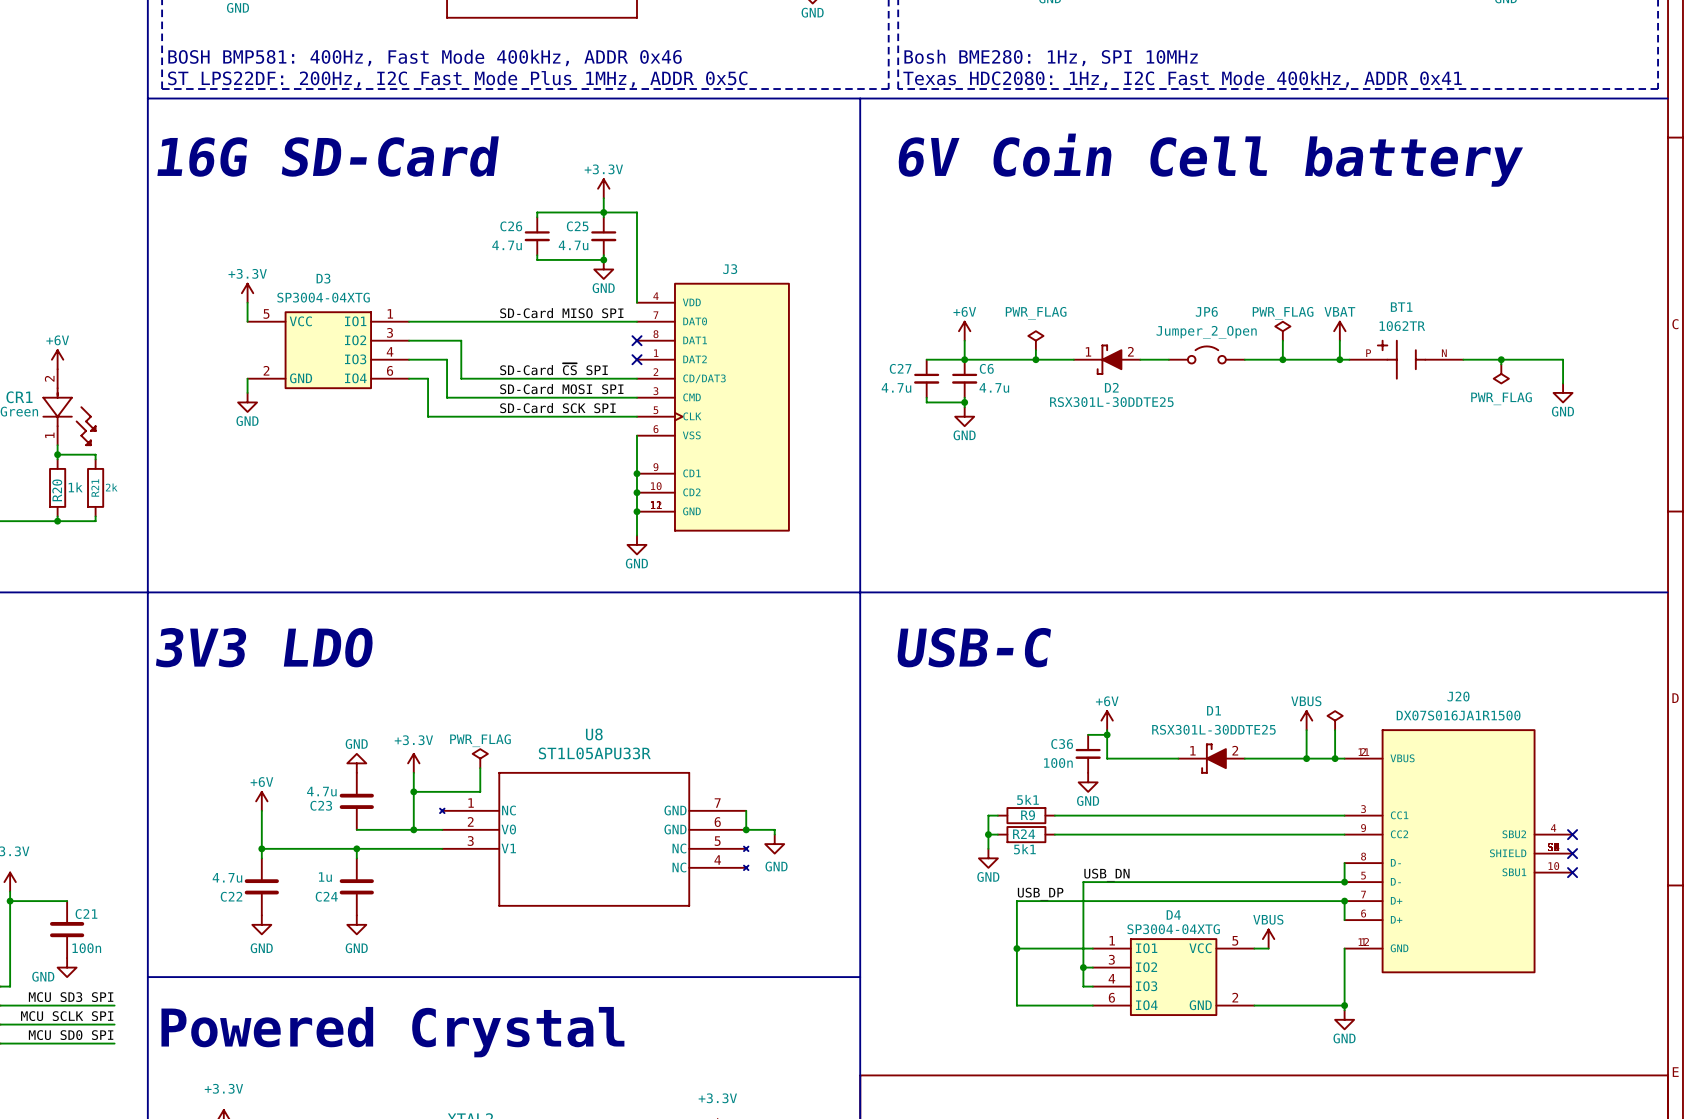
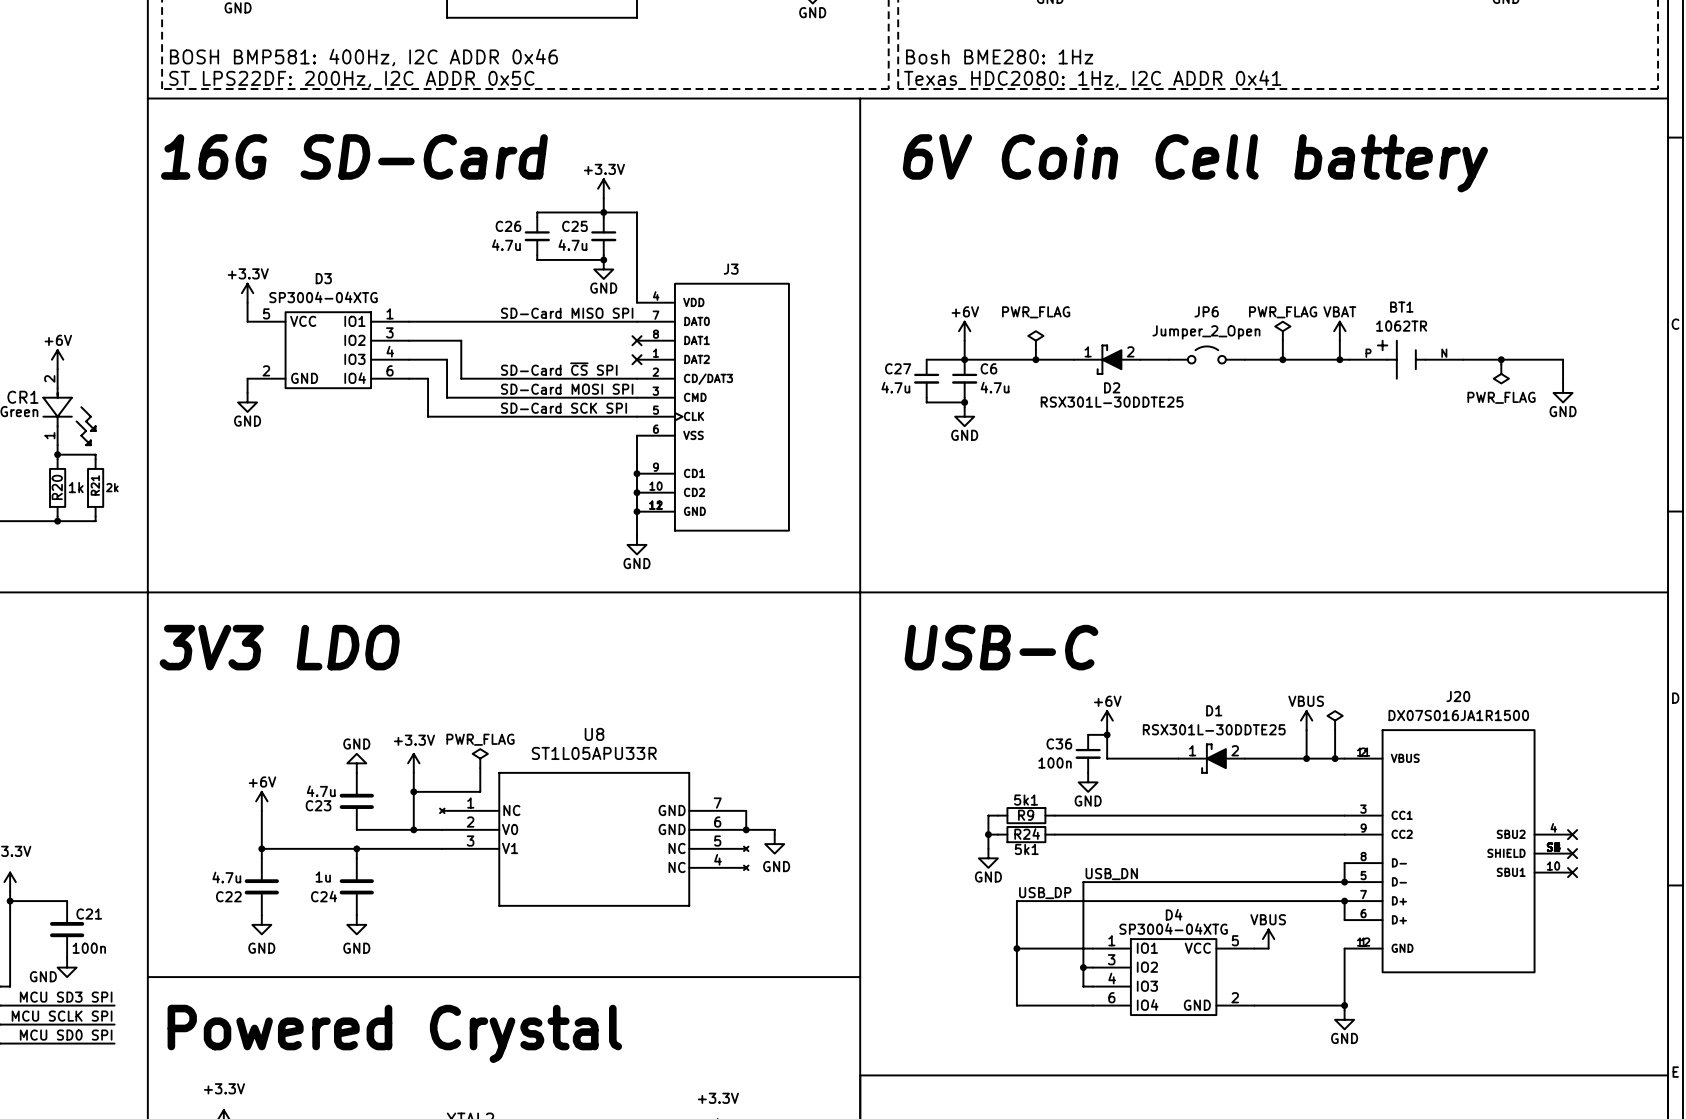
text: BOSH BMP581: 400Hz, Fast Mode 400kHz, ADDR 0x46 (425, 57) -> BOSH BMP581: 400Hz, I2C ADDR 0x46 (363, 57)
text: Bosh BME280: 1Hz, SPI 10MHz (1051, 57) -> Bosh BME280: 1Hz (999, 56)
text: ST LPS22DF: 200Hz, I2C Fast Mode Plus 1MHz, ADDR 0x5C (457, 79) -> ST LPS22DF: 200Hz, I2C ADDR 0x5C (351, 79)
text: Texas HDC2080: 1Hz, I2C Fast Mode 400kHz, ADDR 0x41 (1182, 79) -> Texas HDC2080: 1Hz, I2C ADDR 0x41 (1092, 78)

